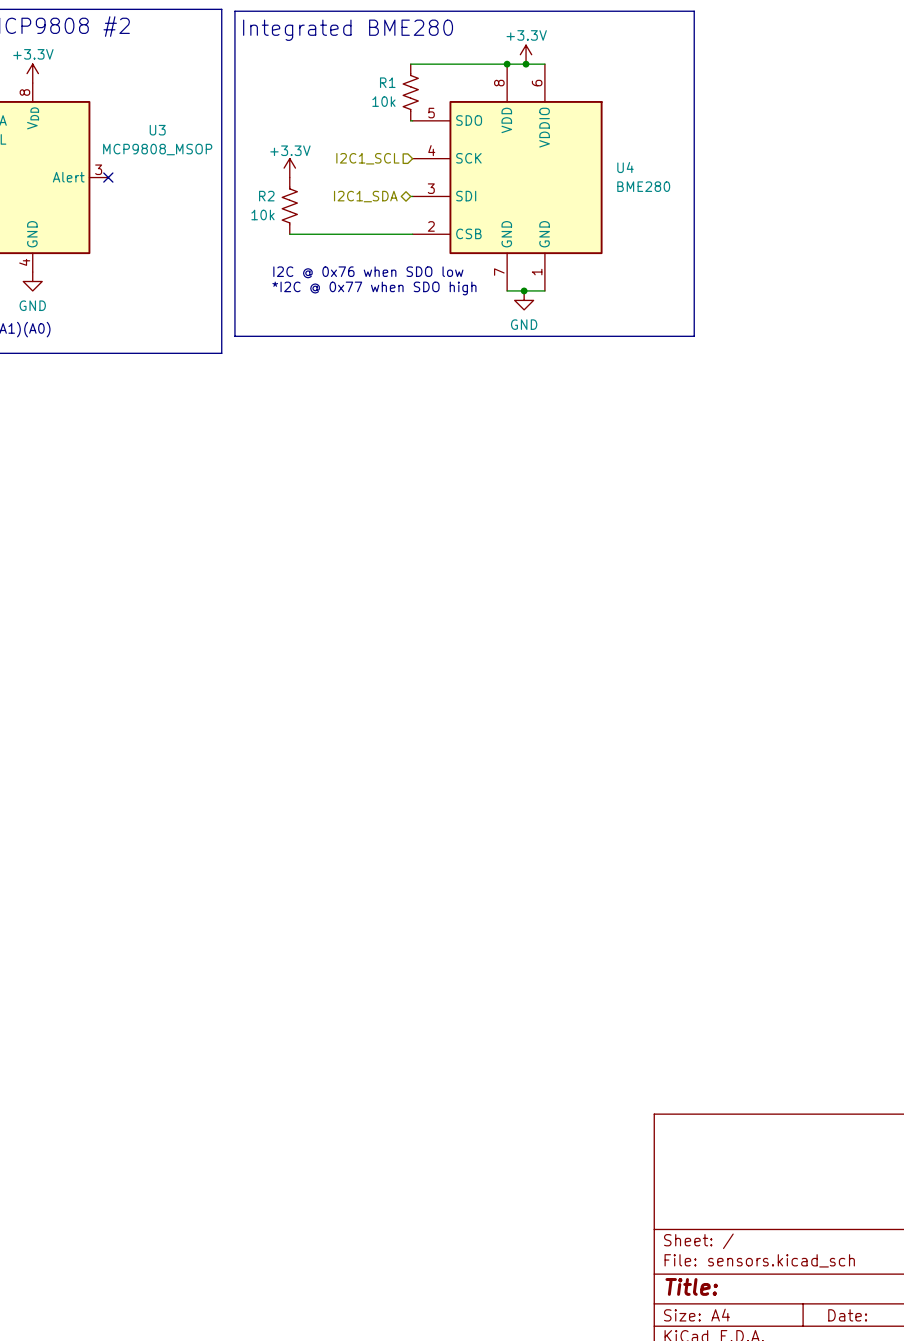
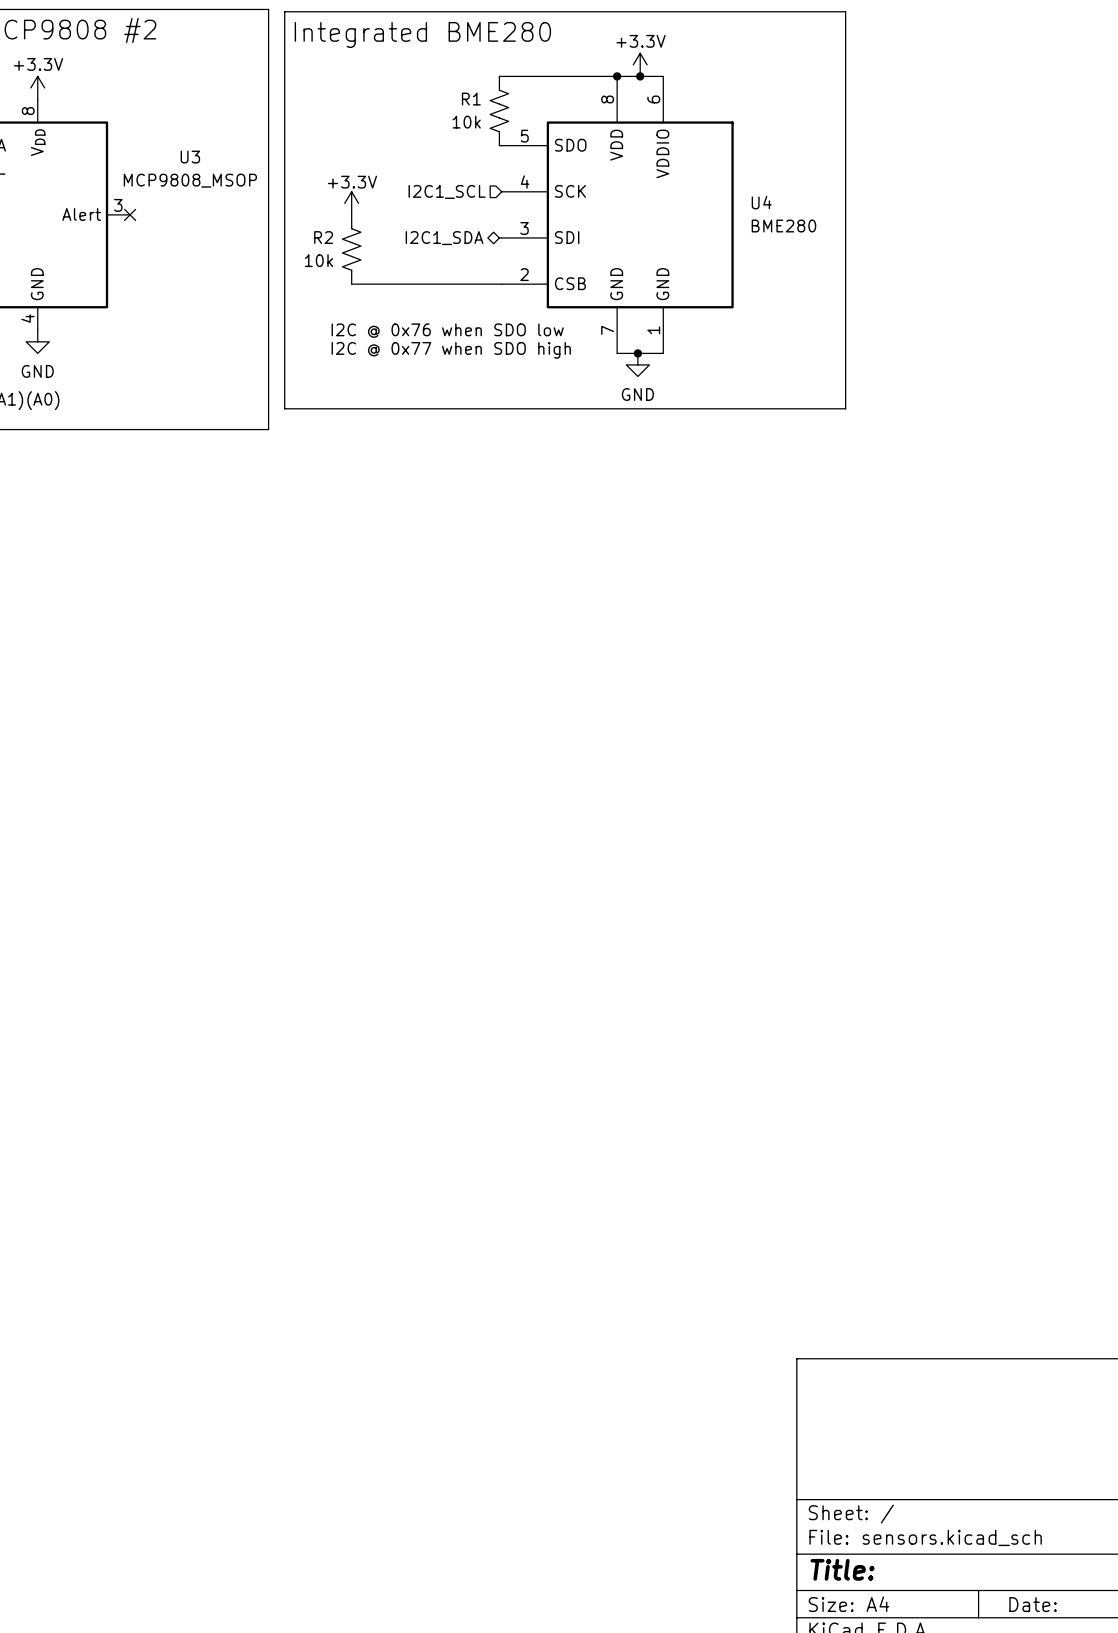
text: *I2C @ 0x77 when SDO high (374, 288) -> I2C @ 0x77 when SDO high (451, 350)

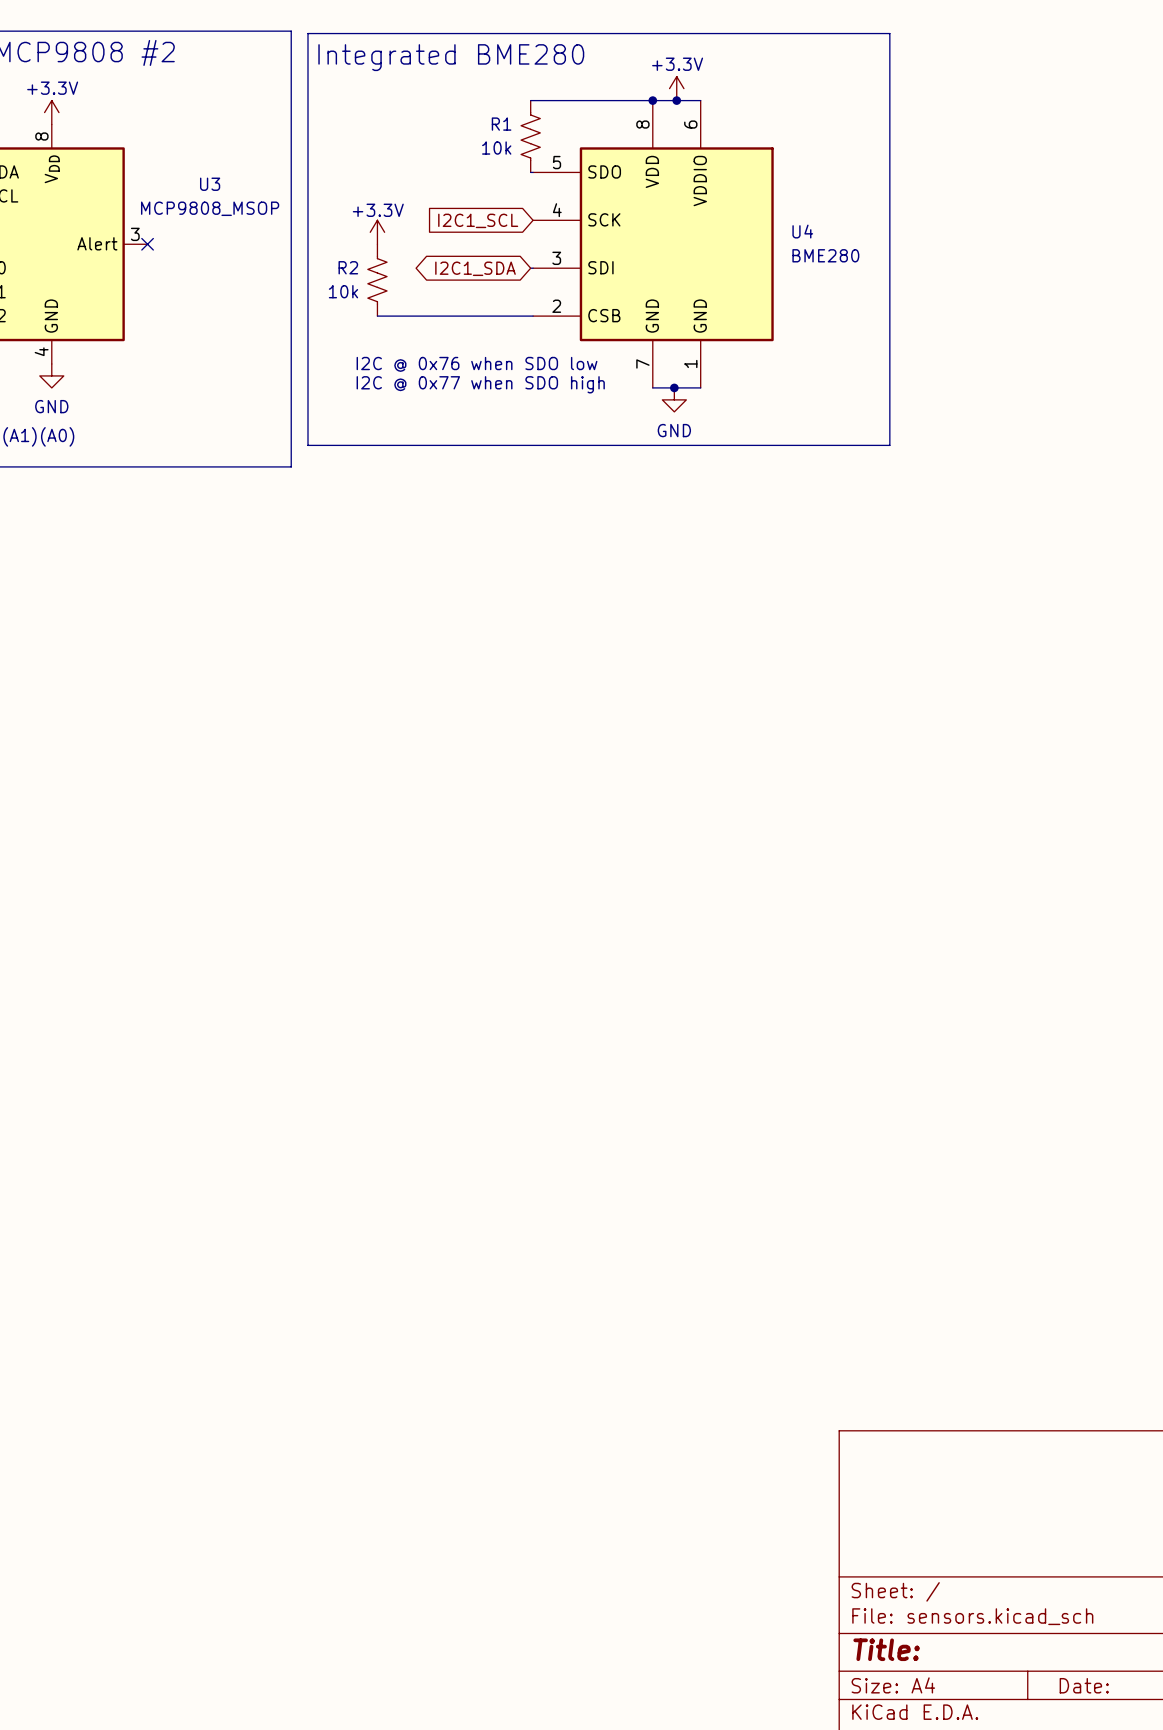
hierarchical label: I2C1_SCL (447, 191) -> none
global label: none -> I2C1_SCL (478, 220)
hierarchical label: I2C1_SDA (444, 238) -> none
global label: none -> I2C1_SDA (475, 268)

